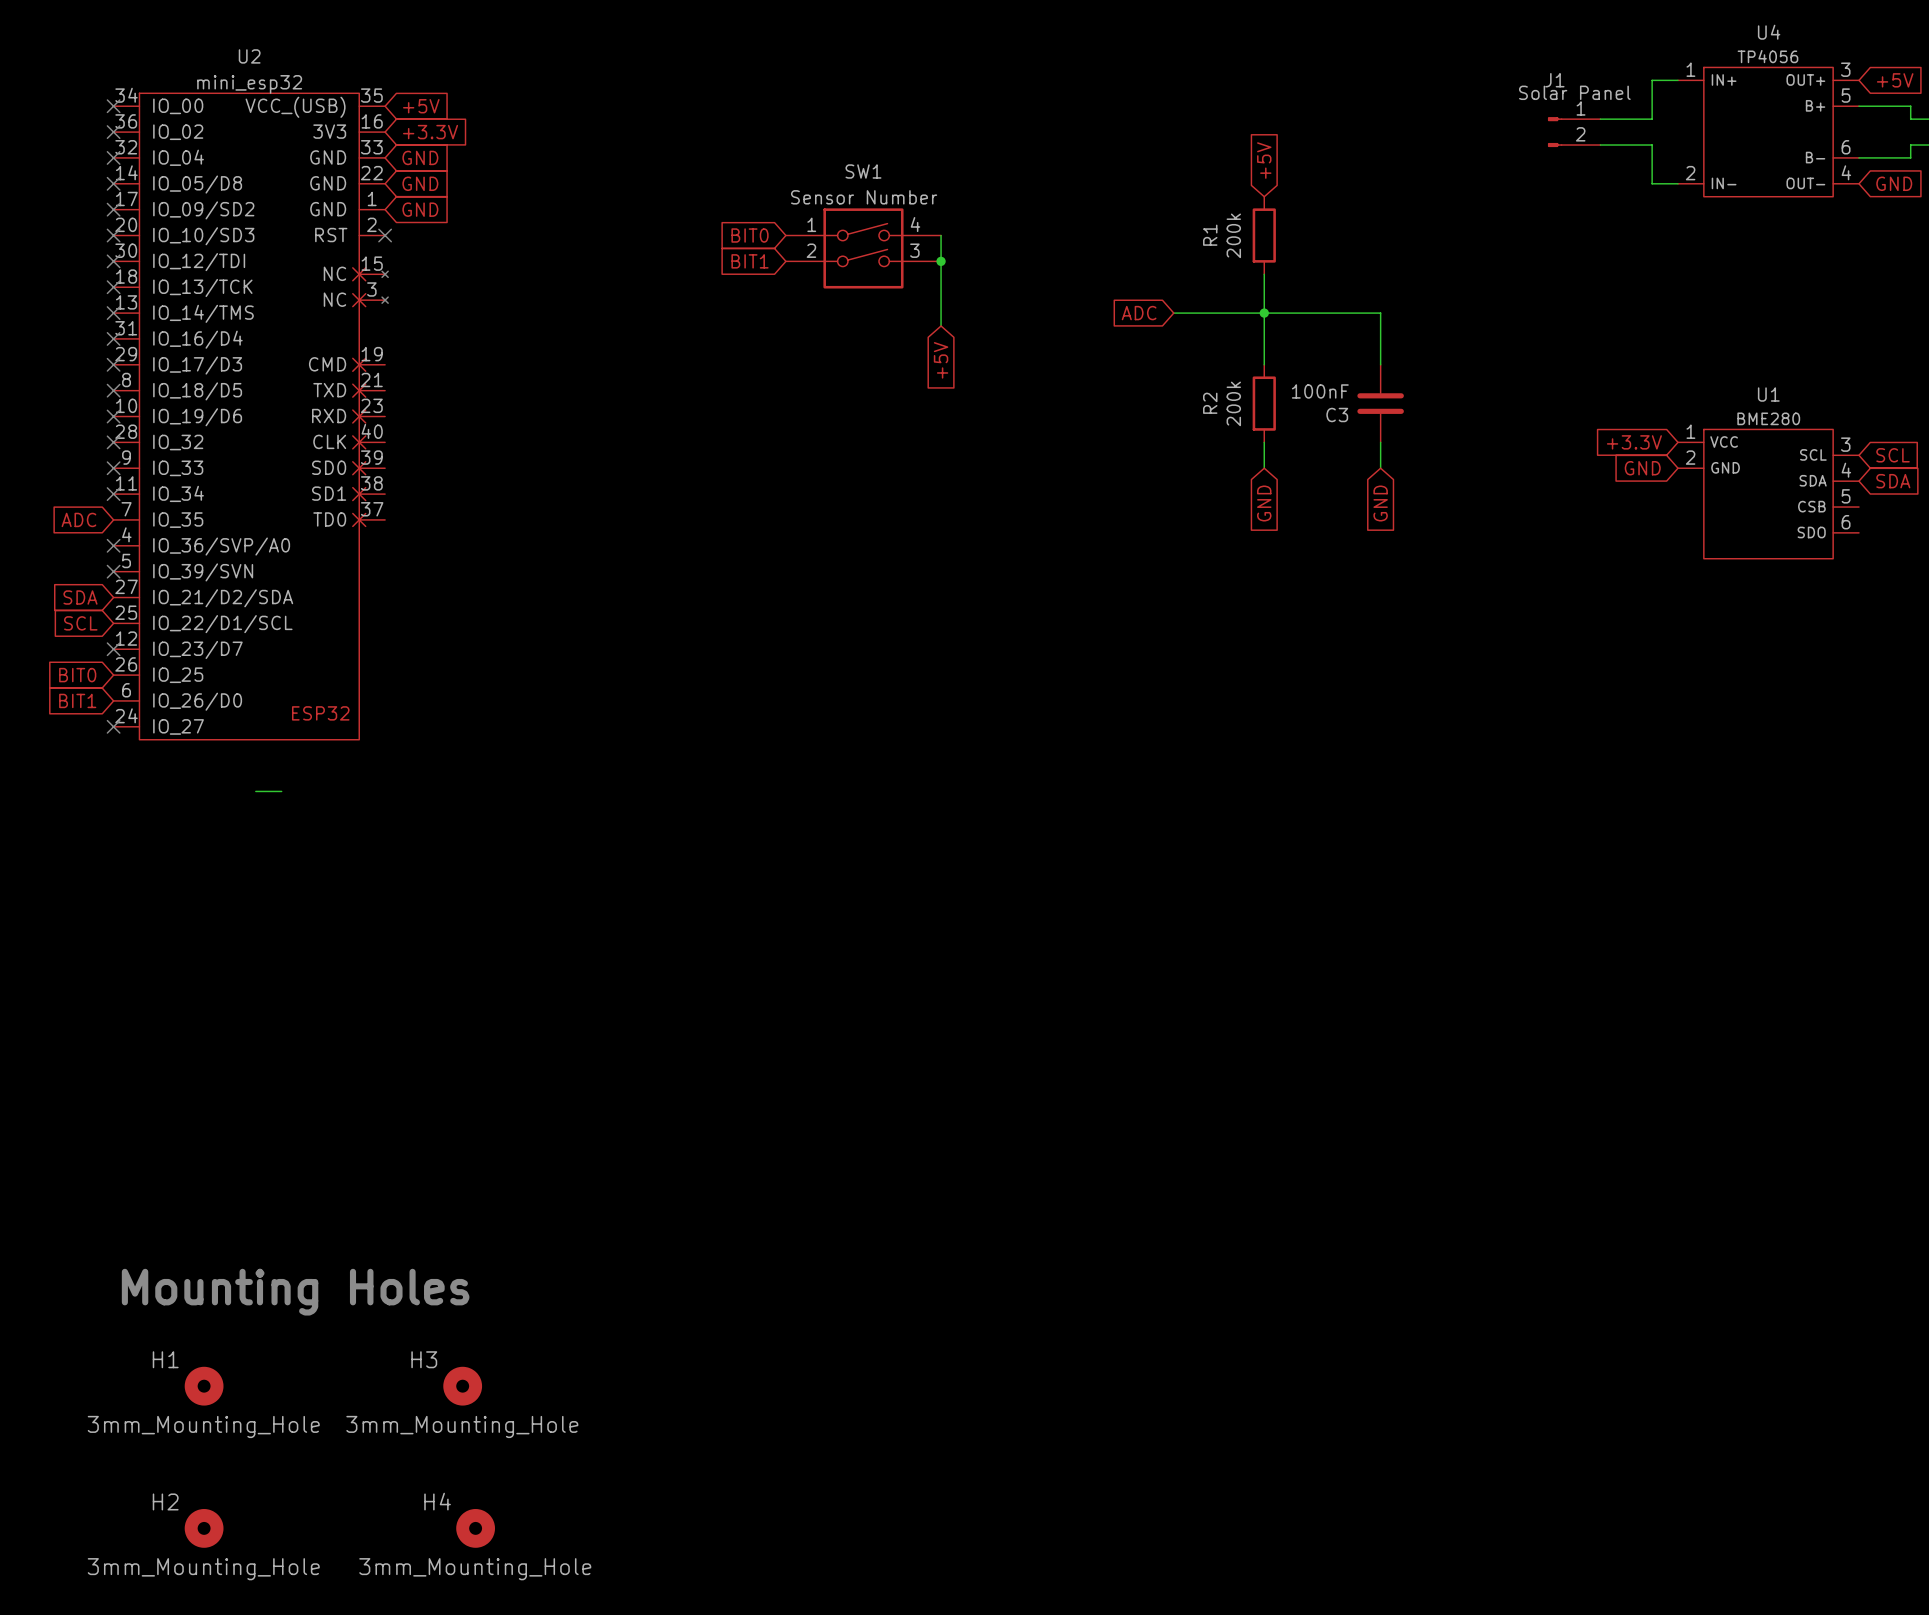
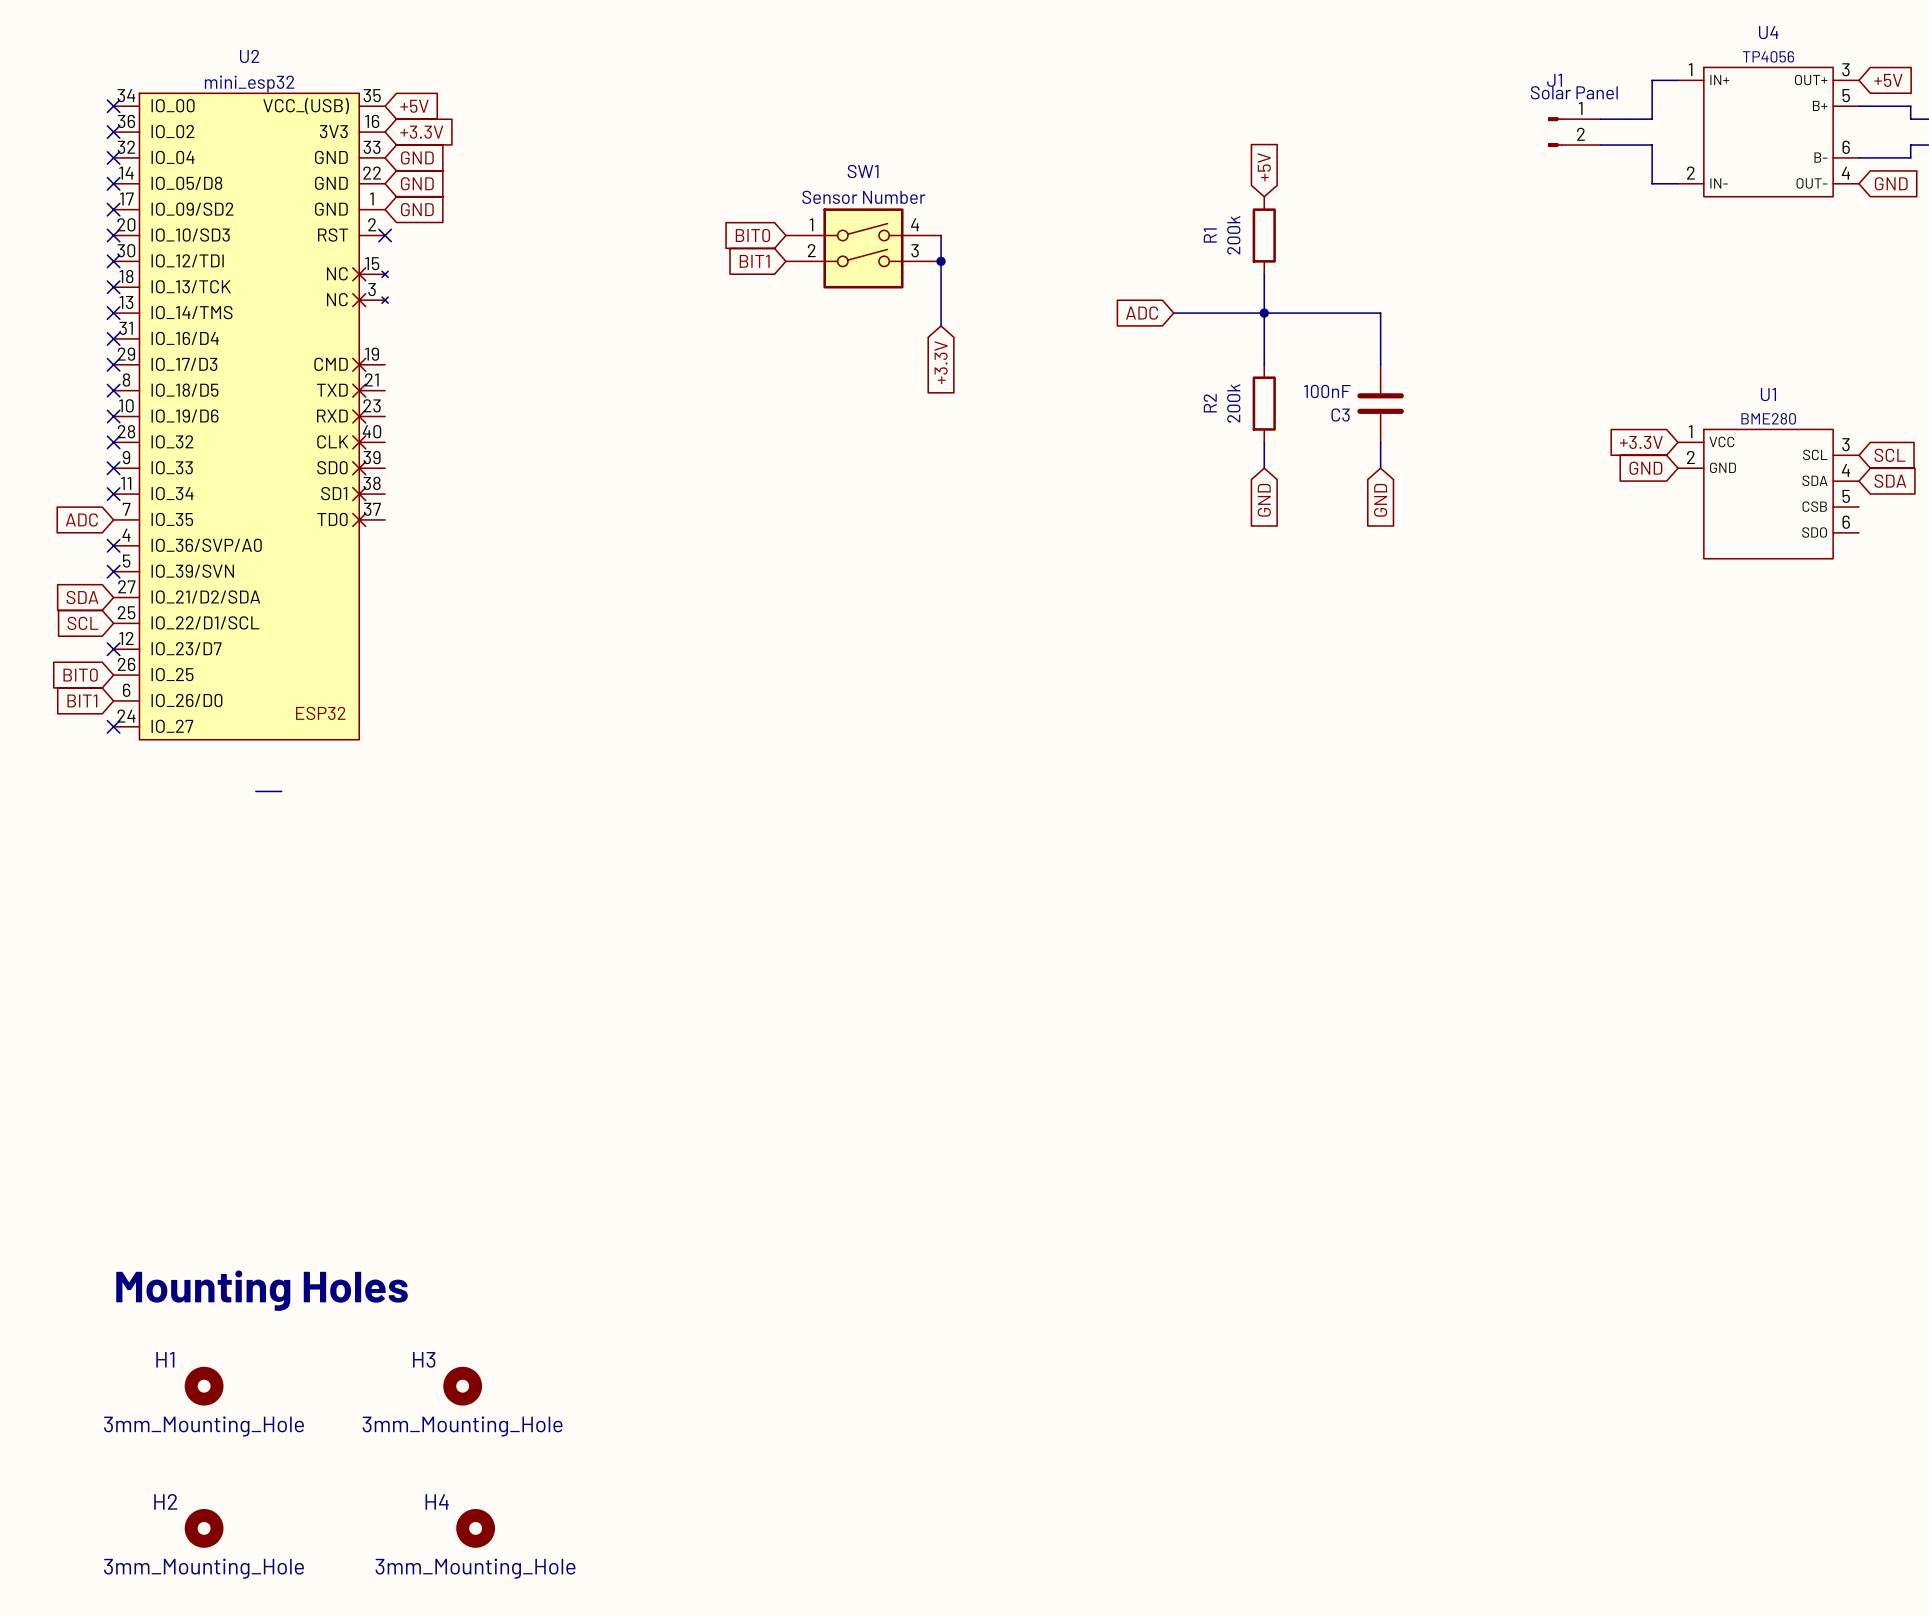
global label: +5V (941, 360) -> +3.3V (941, 362)

